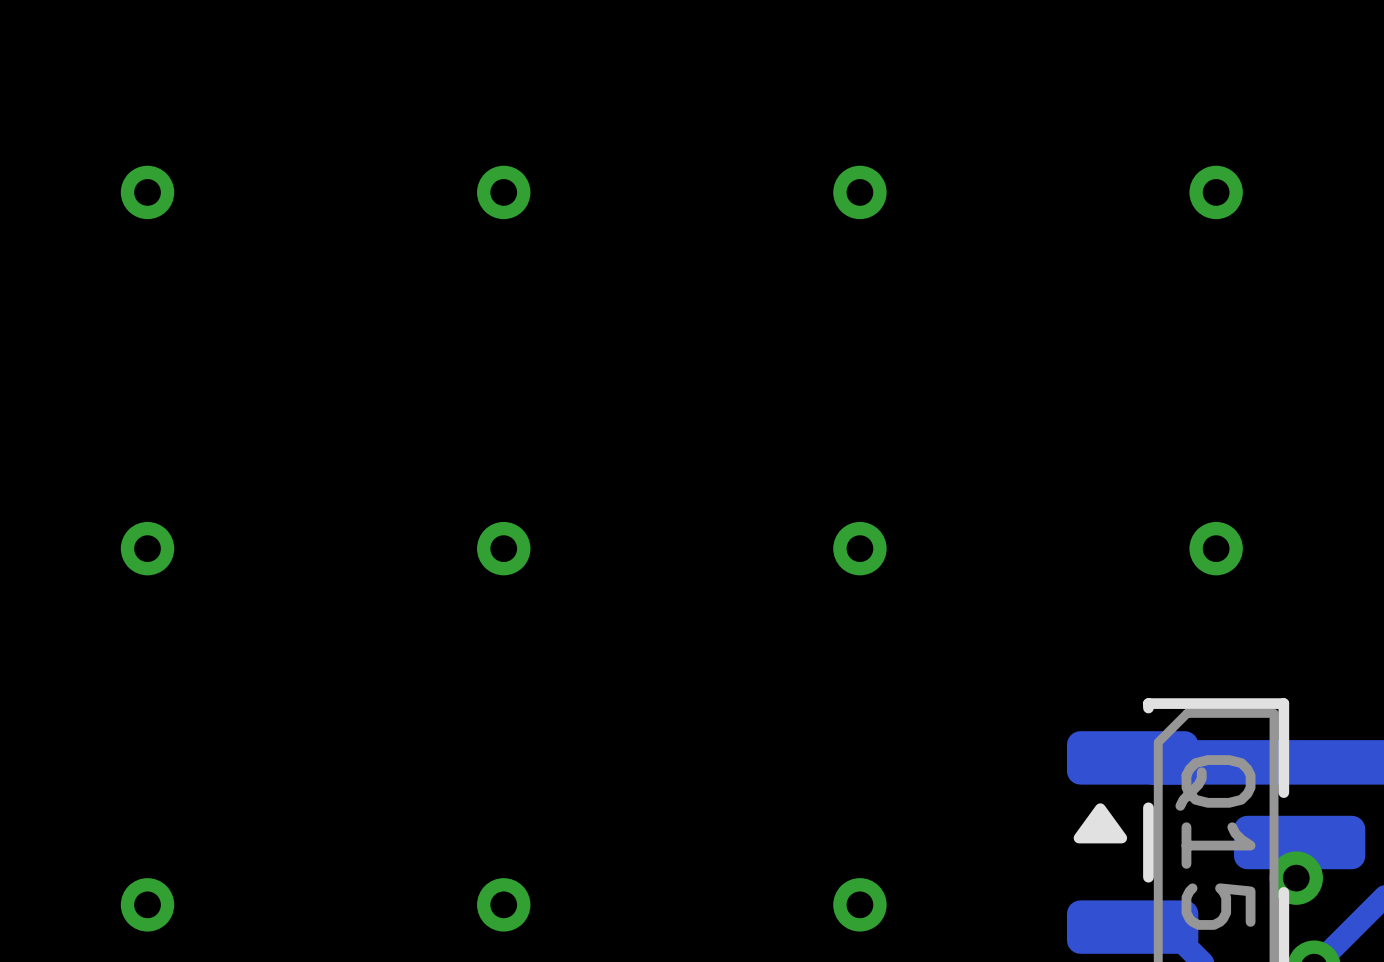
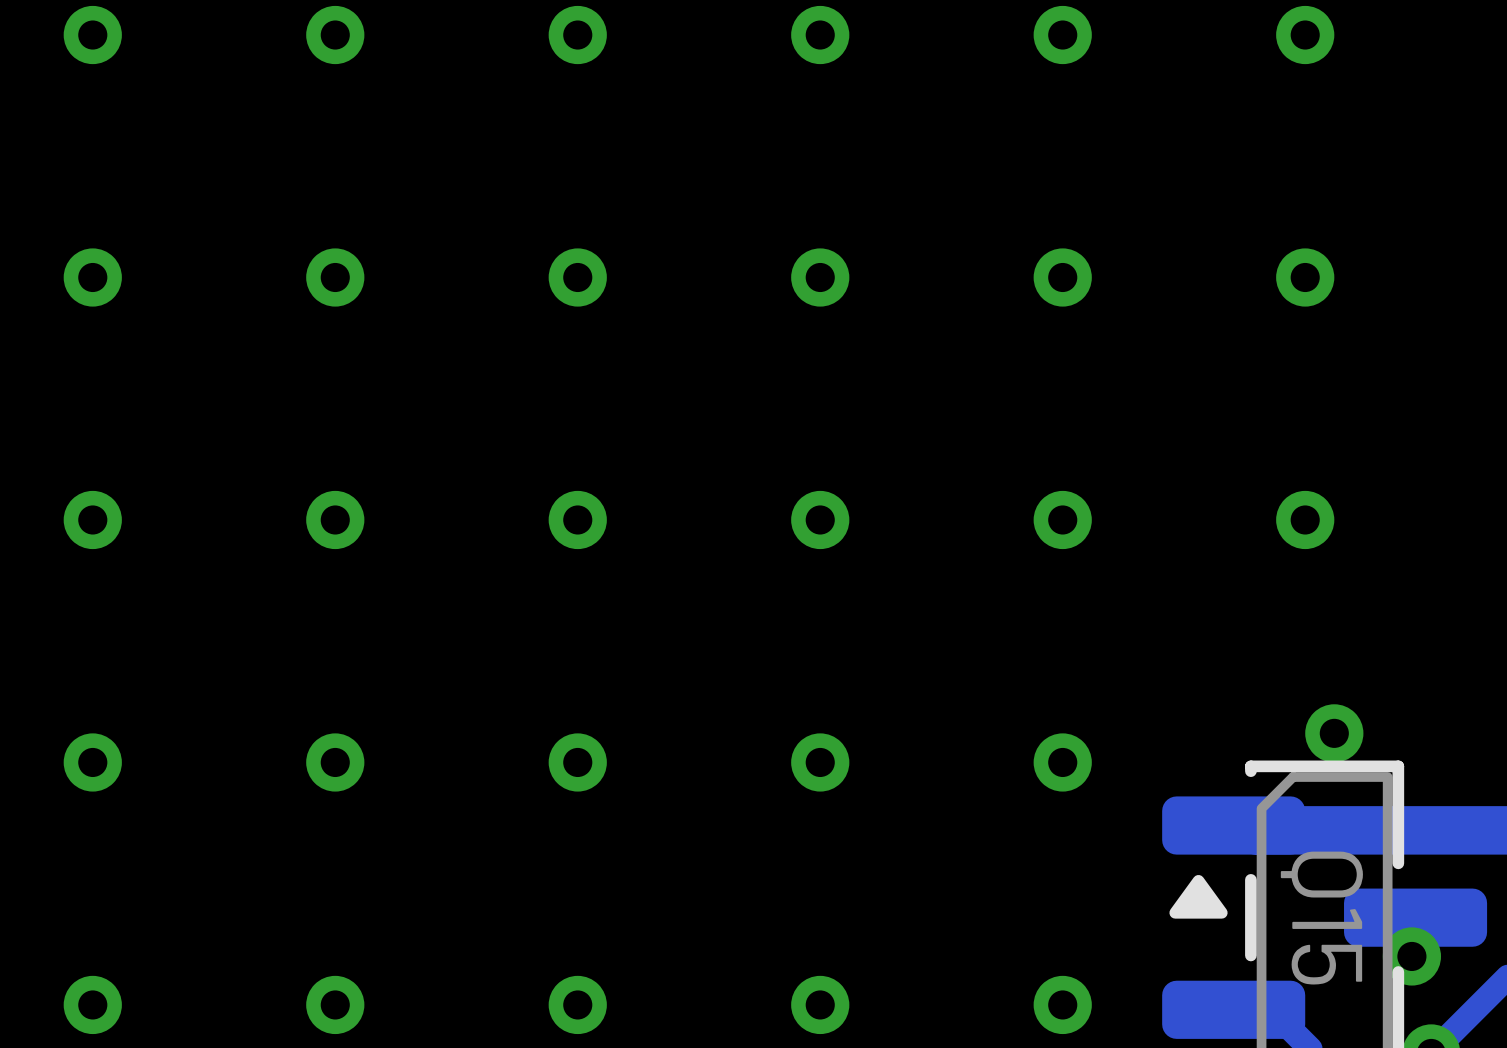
via: none -> (92, 35)
via: none -> (335, 35)
via: none -> (577, 35)
via: none -> (820, 35)
via: none -> (1062, 35)
via: none -> (1305, 35)
via: (147, 192) -> none
via position: (503, 192) -> (577, 277)
via: (859, 192) -> none
via position: (1216, 192) -> (1305, 277)
via: none -> (92, 277)
via: none -> (335, 277)
via: none -> (820, 277)
via: none -> (1062, 277)
via: none -> (92, 519)
via: none -> (335, 519)
via: none -> (577, 519)
via: none -> (820, 519)
via: none -> (1062, 519)
via: none -> (1305, 519)
via: (147, 548) -> none
via: (503, 548) -> none
via: (859, 548) -> none
via: (1216, 548) -> none
via: none -> (1334, 733)
via: none -> (92, 762)
via: none -> (335, 762)
via: none -> (577, 762)
via: none -> (820, 762)
via: none -> (1062, 762)
via position: (147, 904) -> (92, 1004)
via position: (503, 904) -> (577, 1004)
via: (859, 904) -> none
via: none -> (335, 1004)
via: none -> (820, 1004)
via: none -> (1062, 1004)

